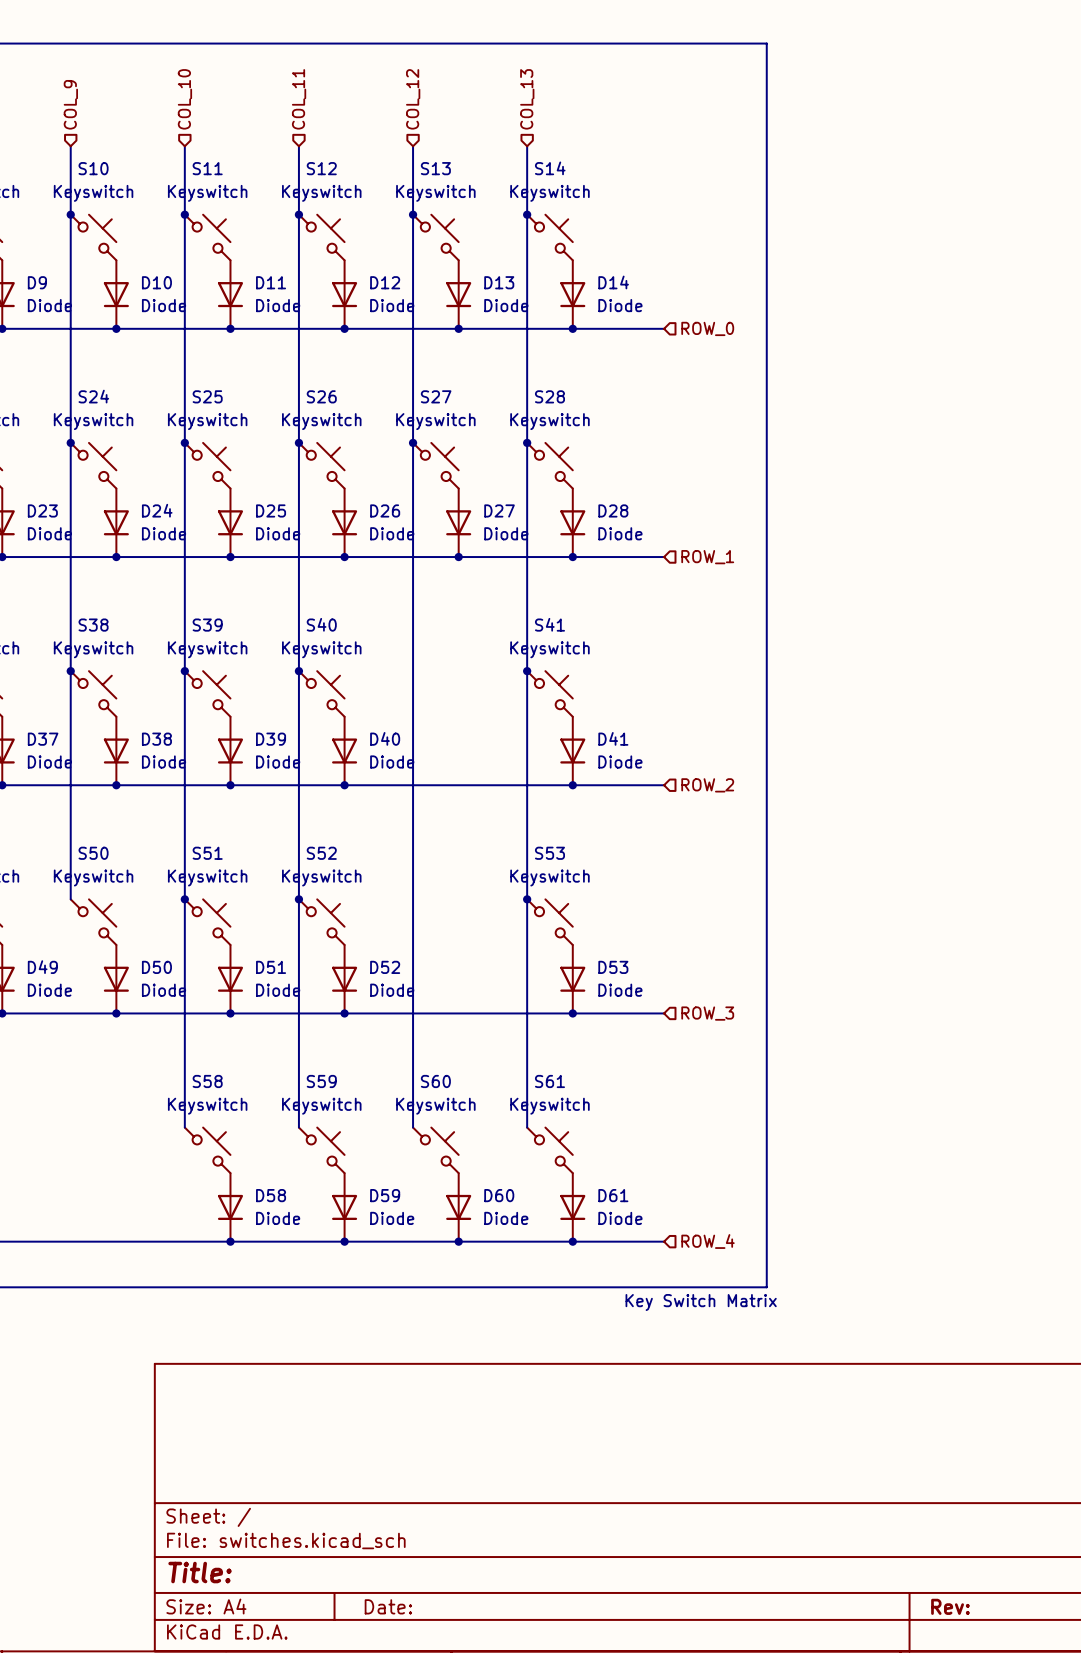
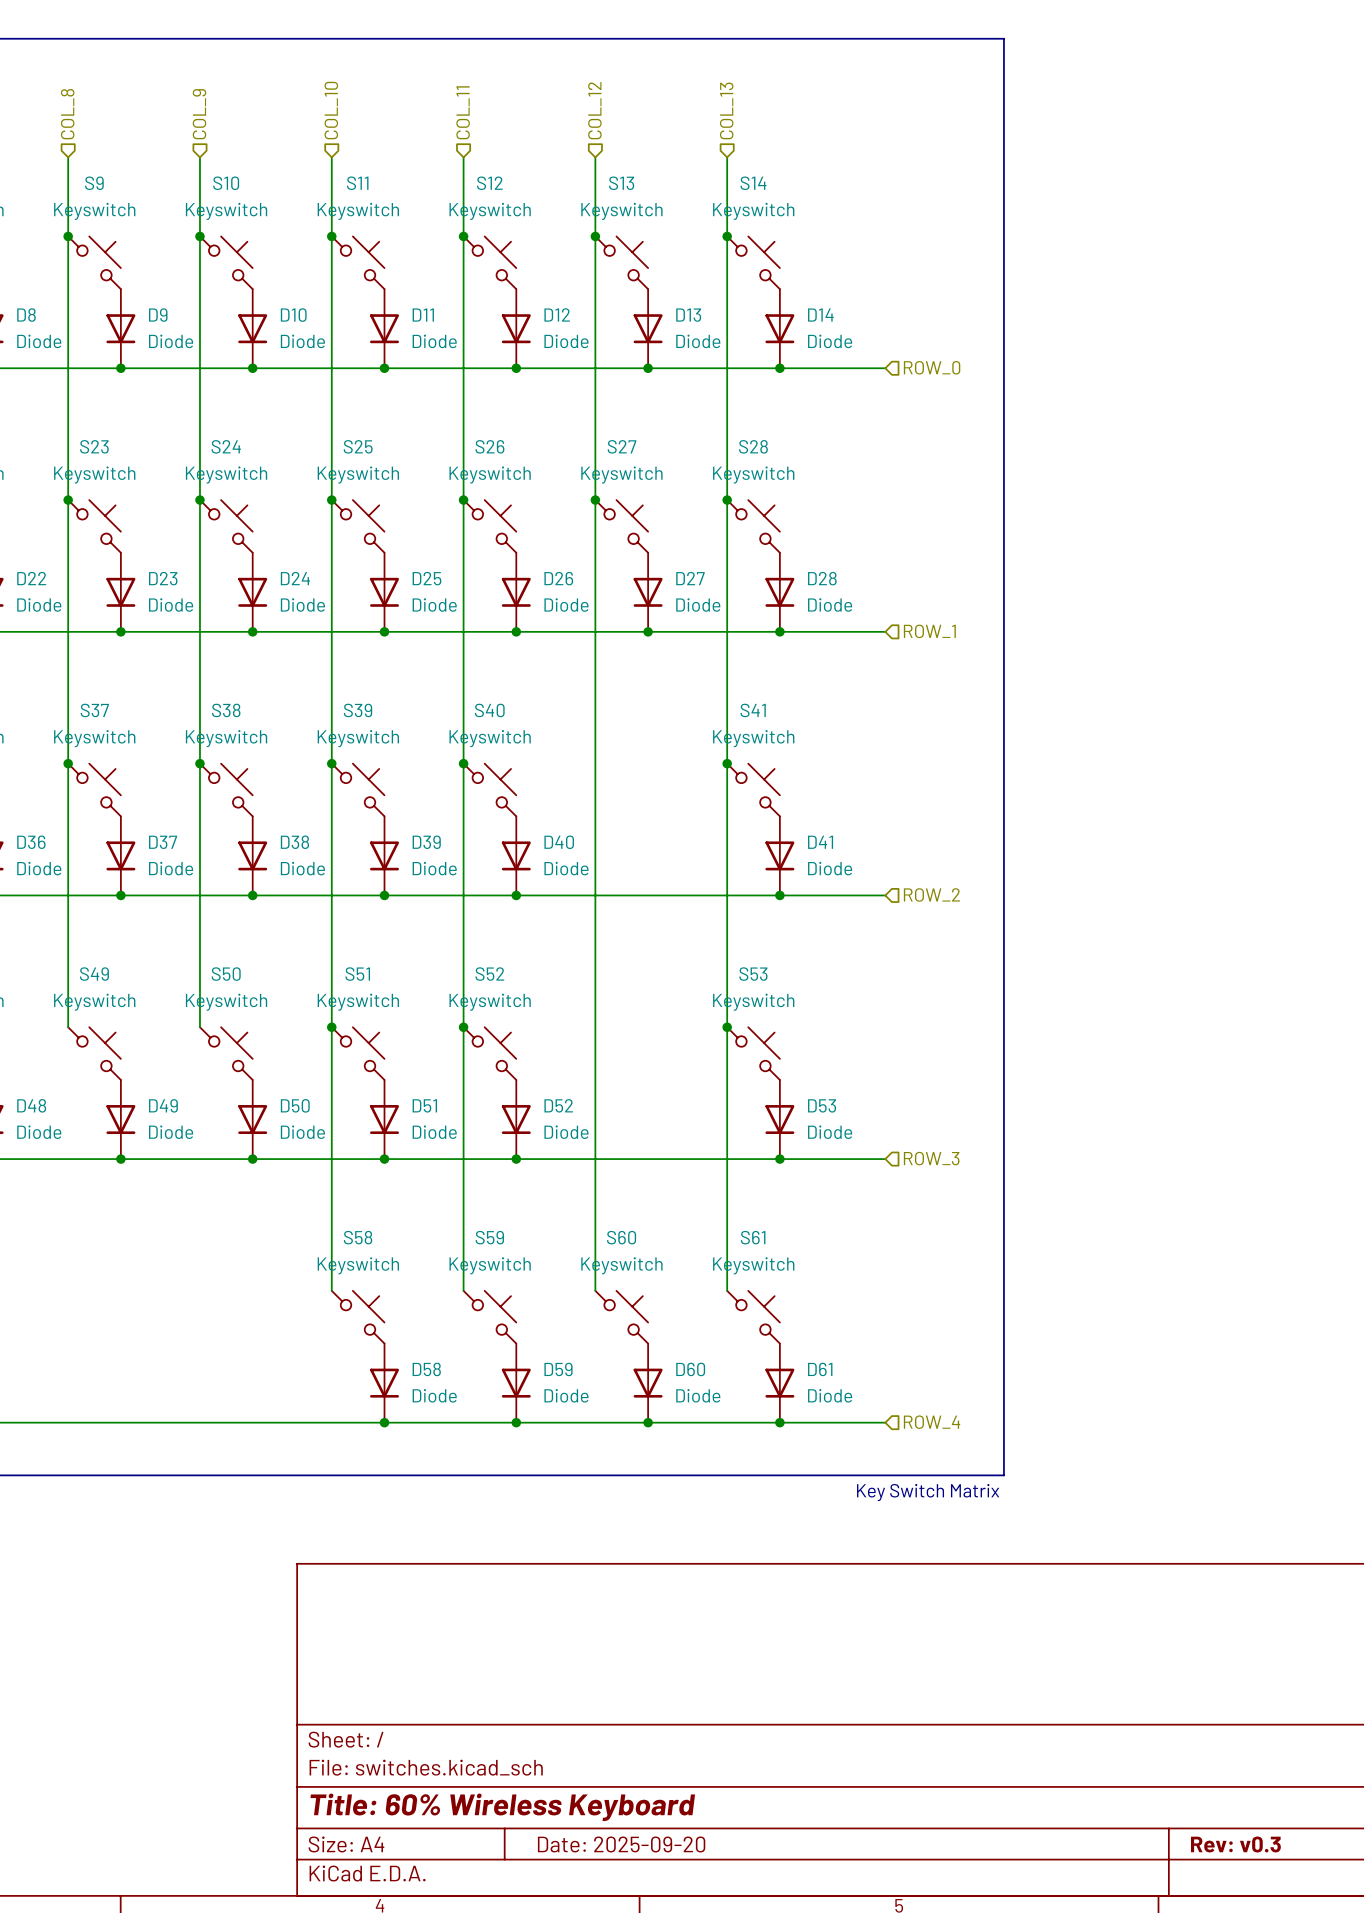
title block: Title: (200, 1572) -> Title: 60% Wireless Keyboard (502, 1807)
title block: Date: (388, 1606) -> Date: 2025-09-20 (621, 1844)
title block: Rev: (950, 1606) -> Rev: v0.3 (1235, 1844)

